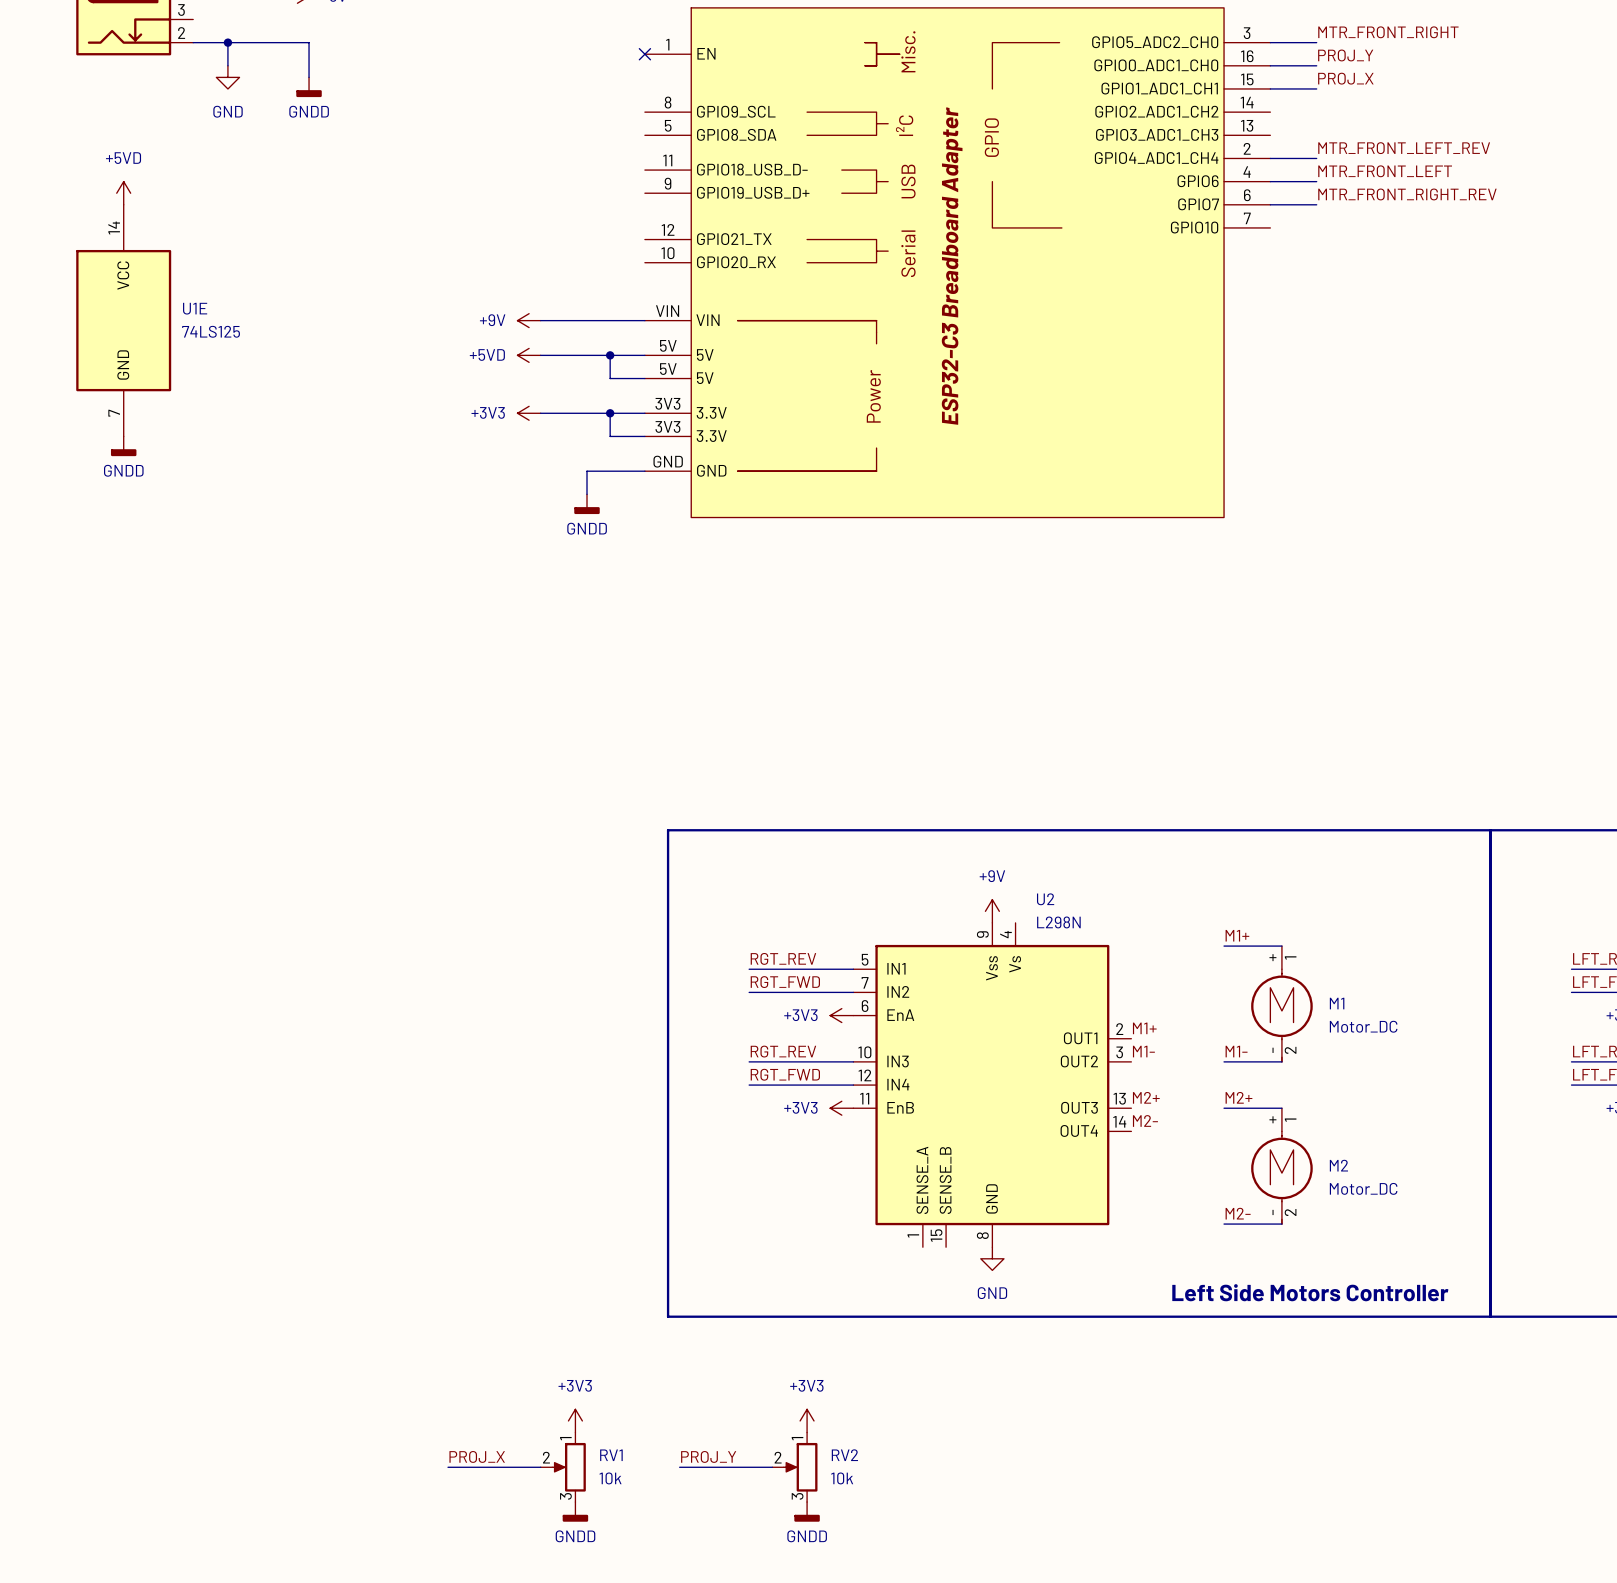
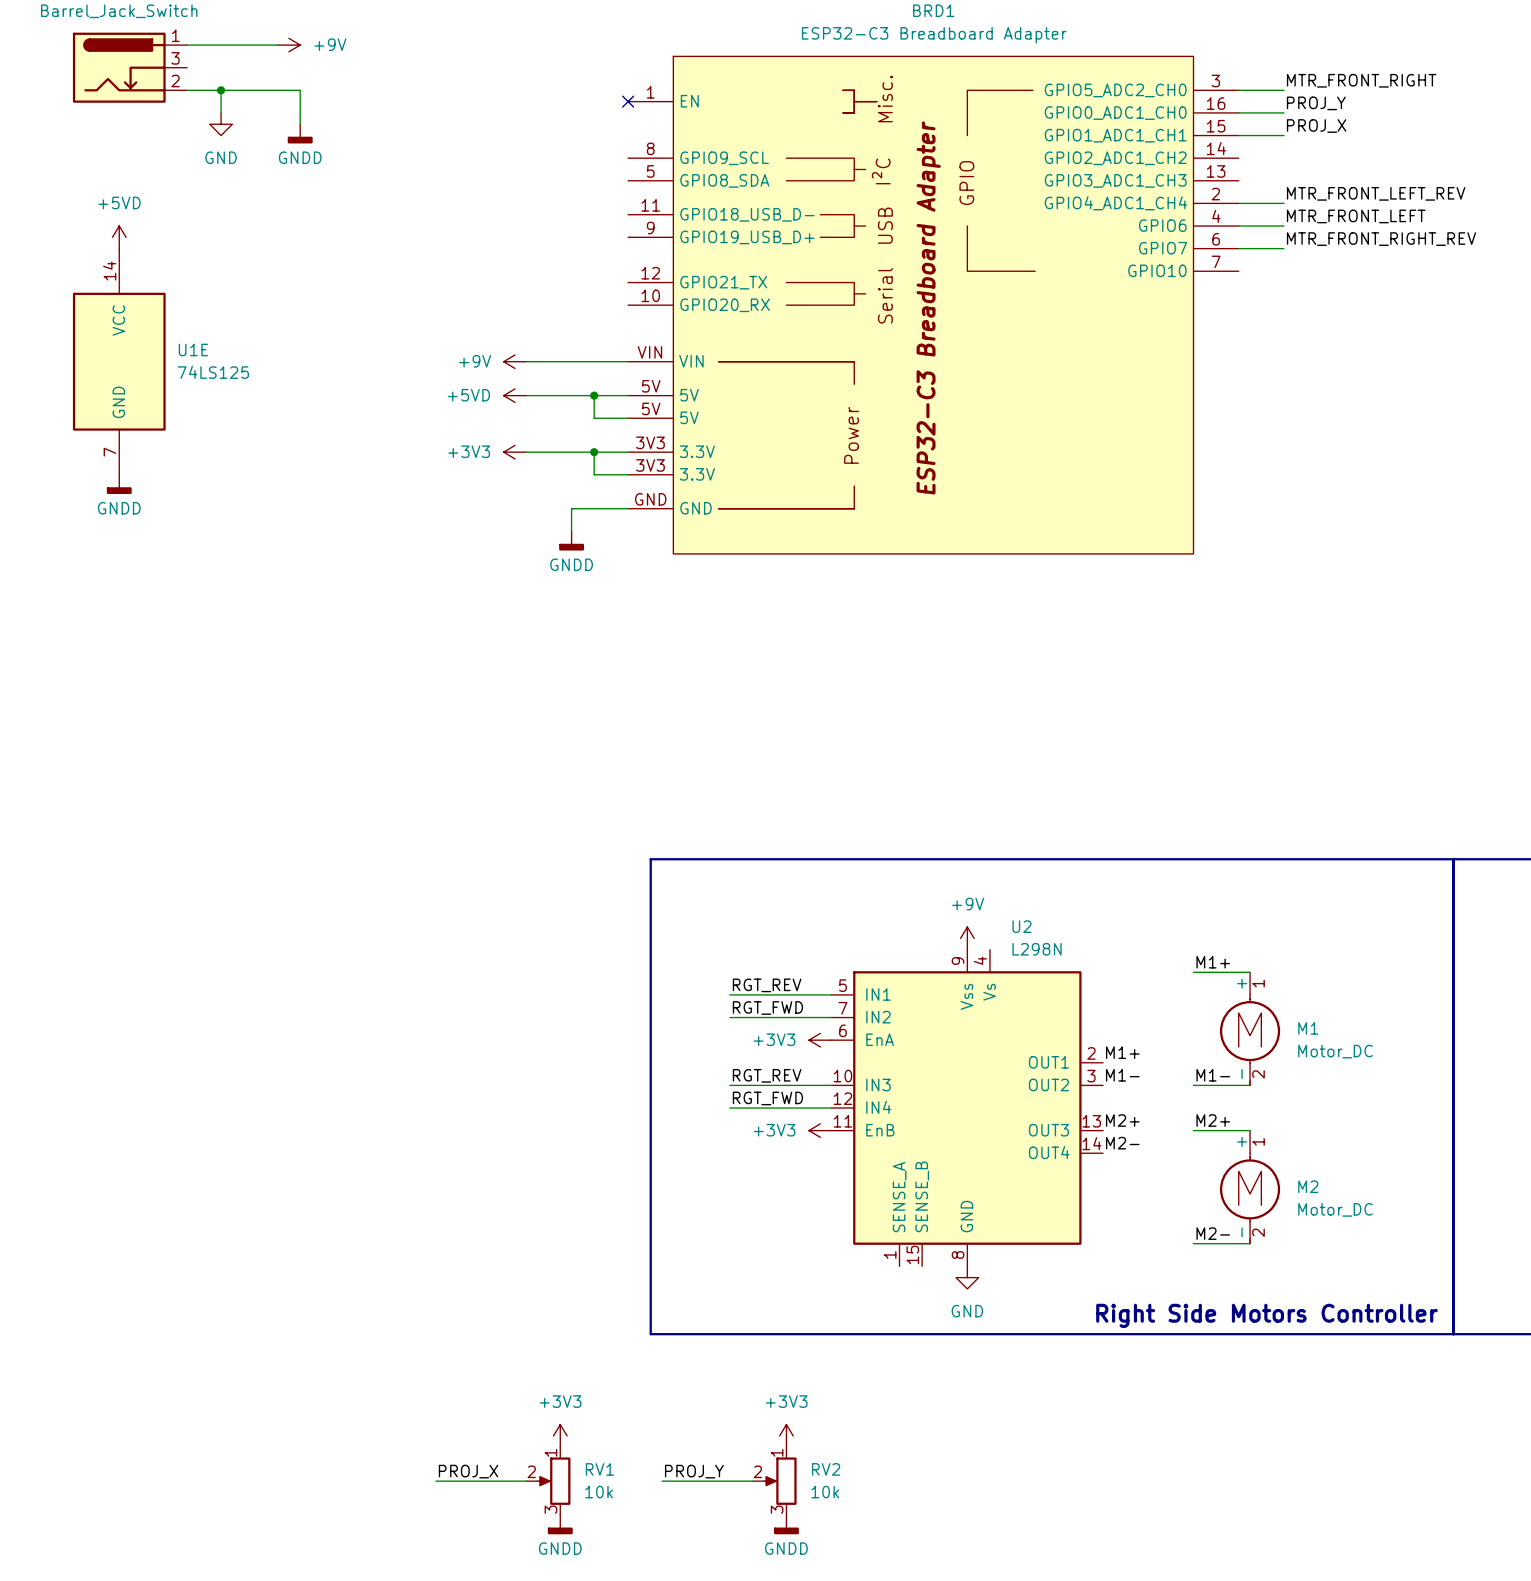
text: Left Side Motors Controller (1310, 1292) -> Right Side Motors Controller (1267, 1315)

